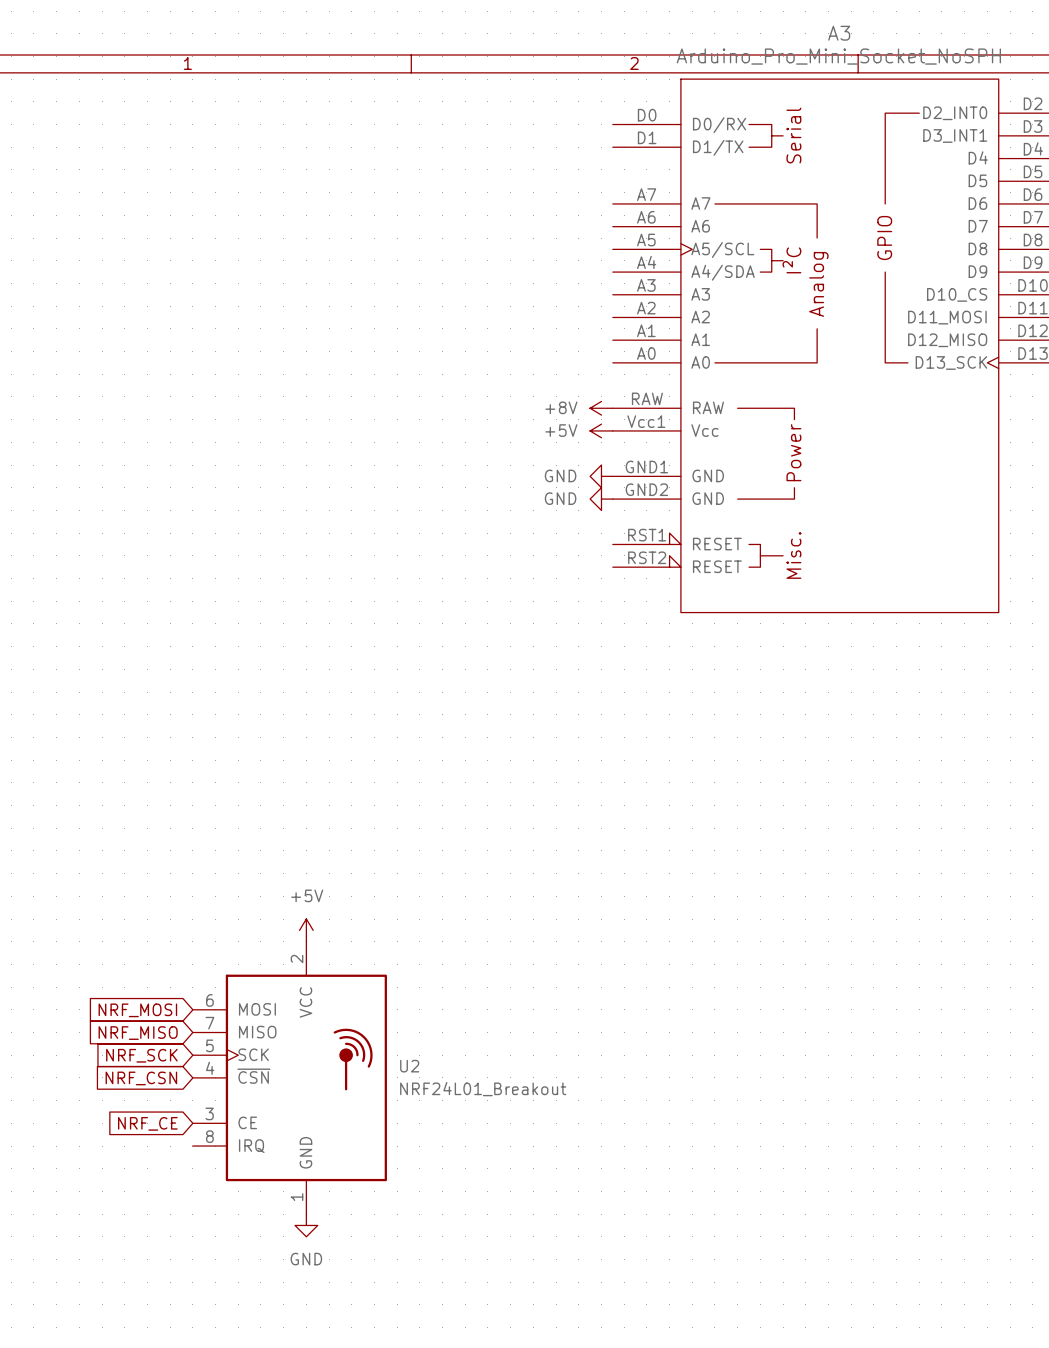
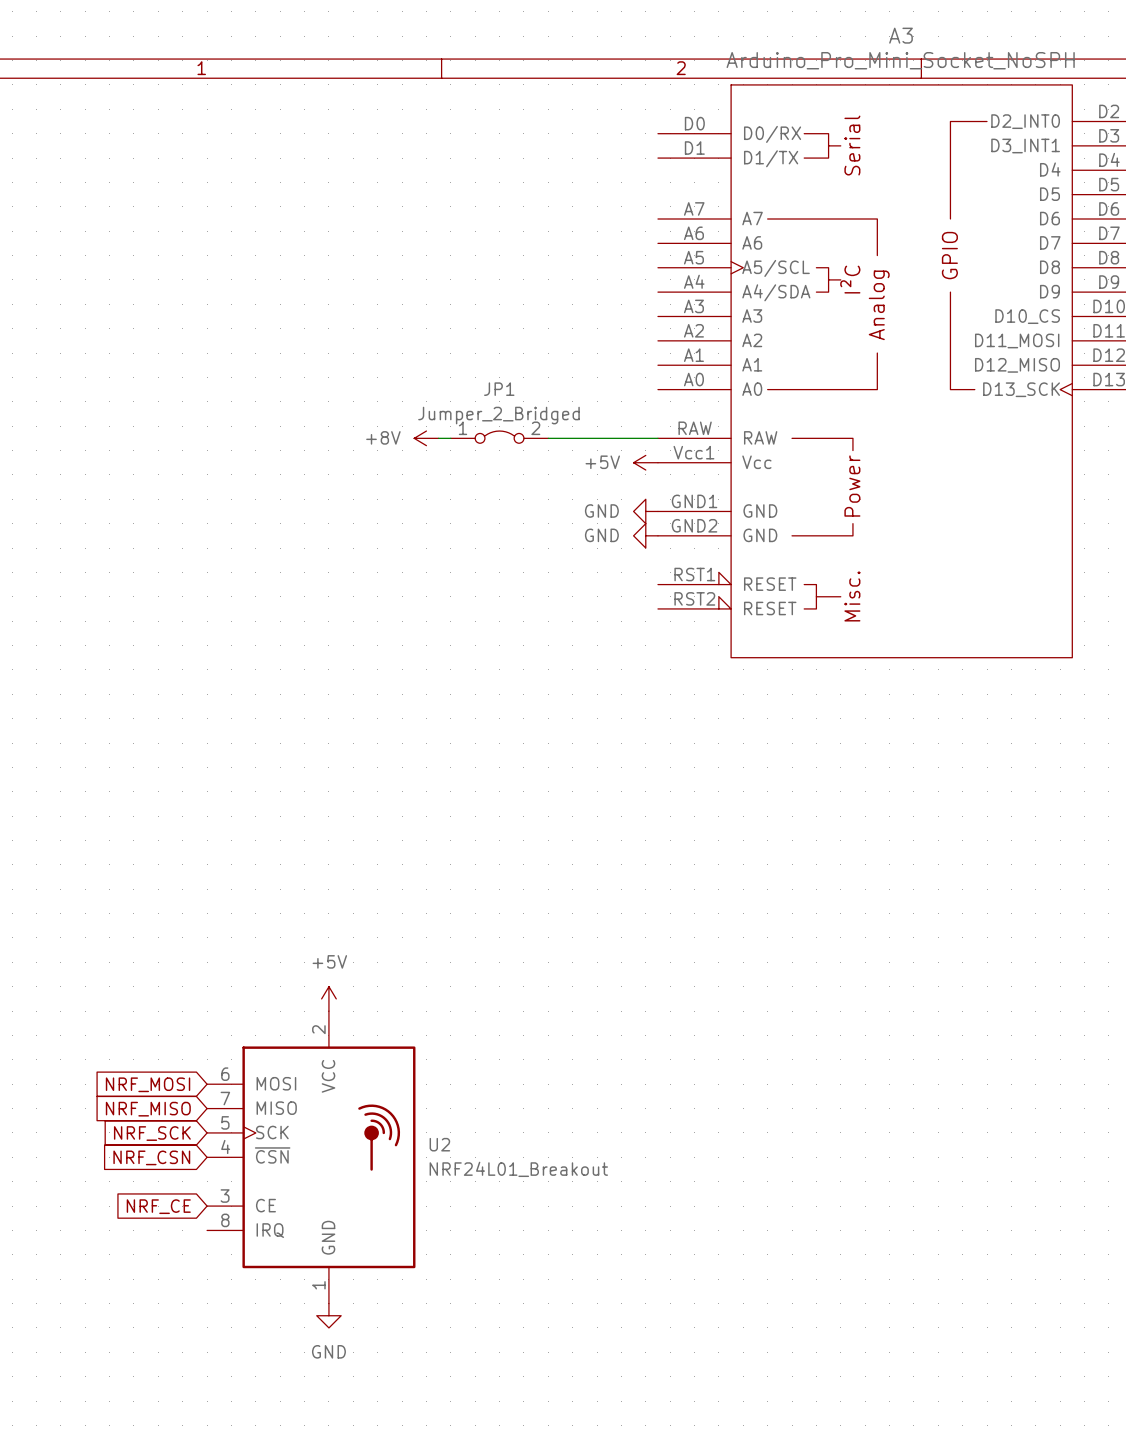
JP1: none -> Jumper_2_Bridged (499, 437)
wire: none -> (438, 438) (450, 438)
wire: none -> (548, 438) (657, 438)
power symbol position: +8V (601, 408) -> +8V (426, 438)

